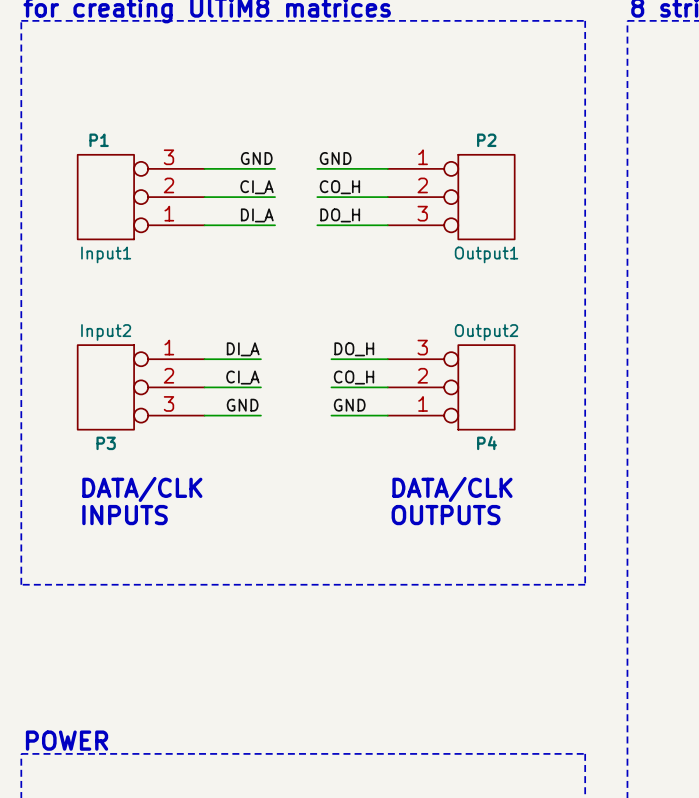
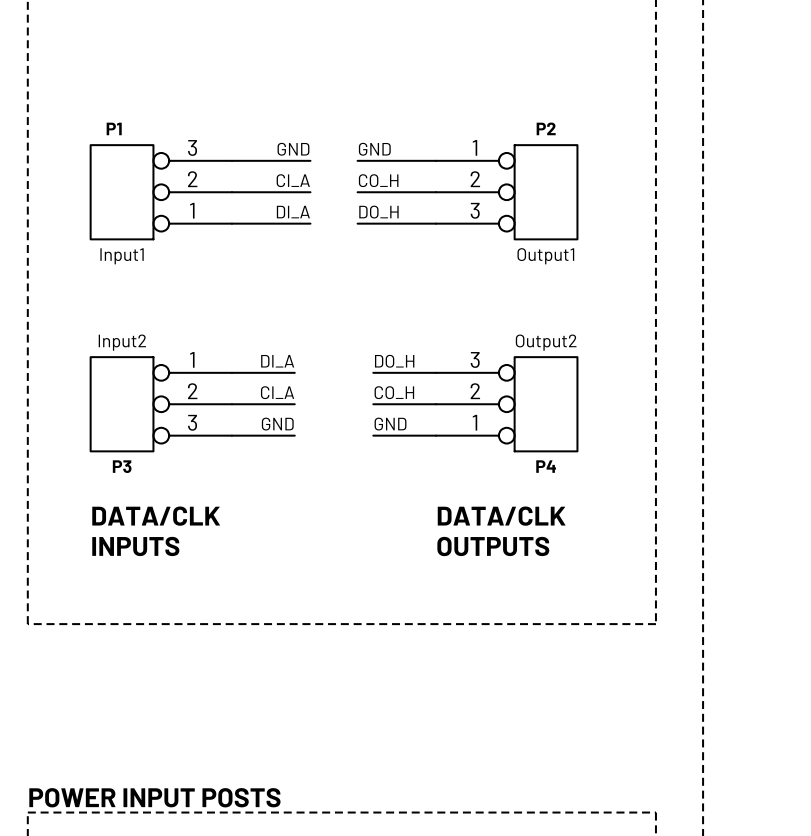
text: POWER (67, 740) -> POWER INPUT POSTS (154, 797)

